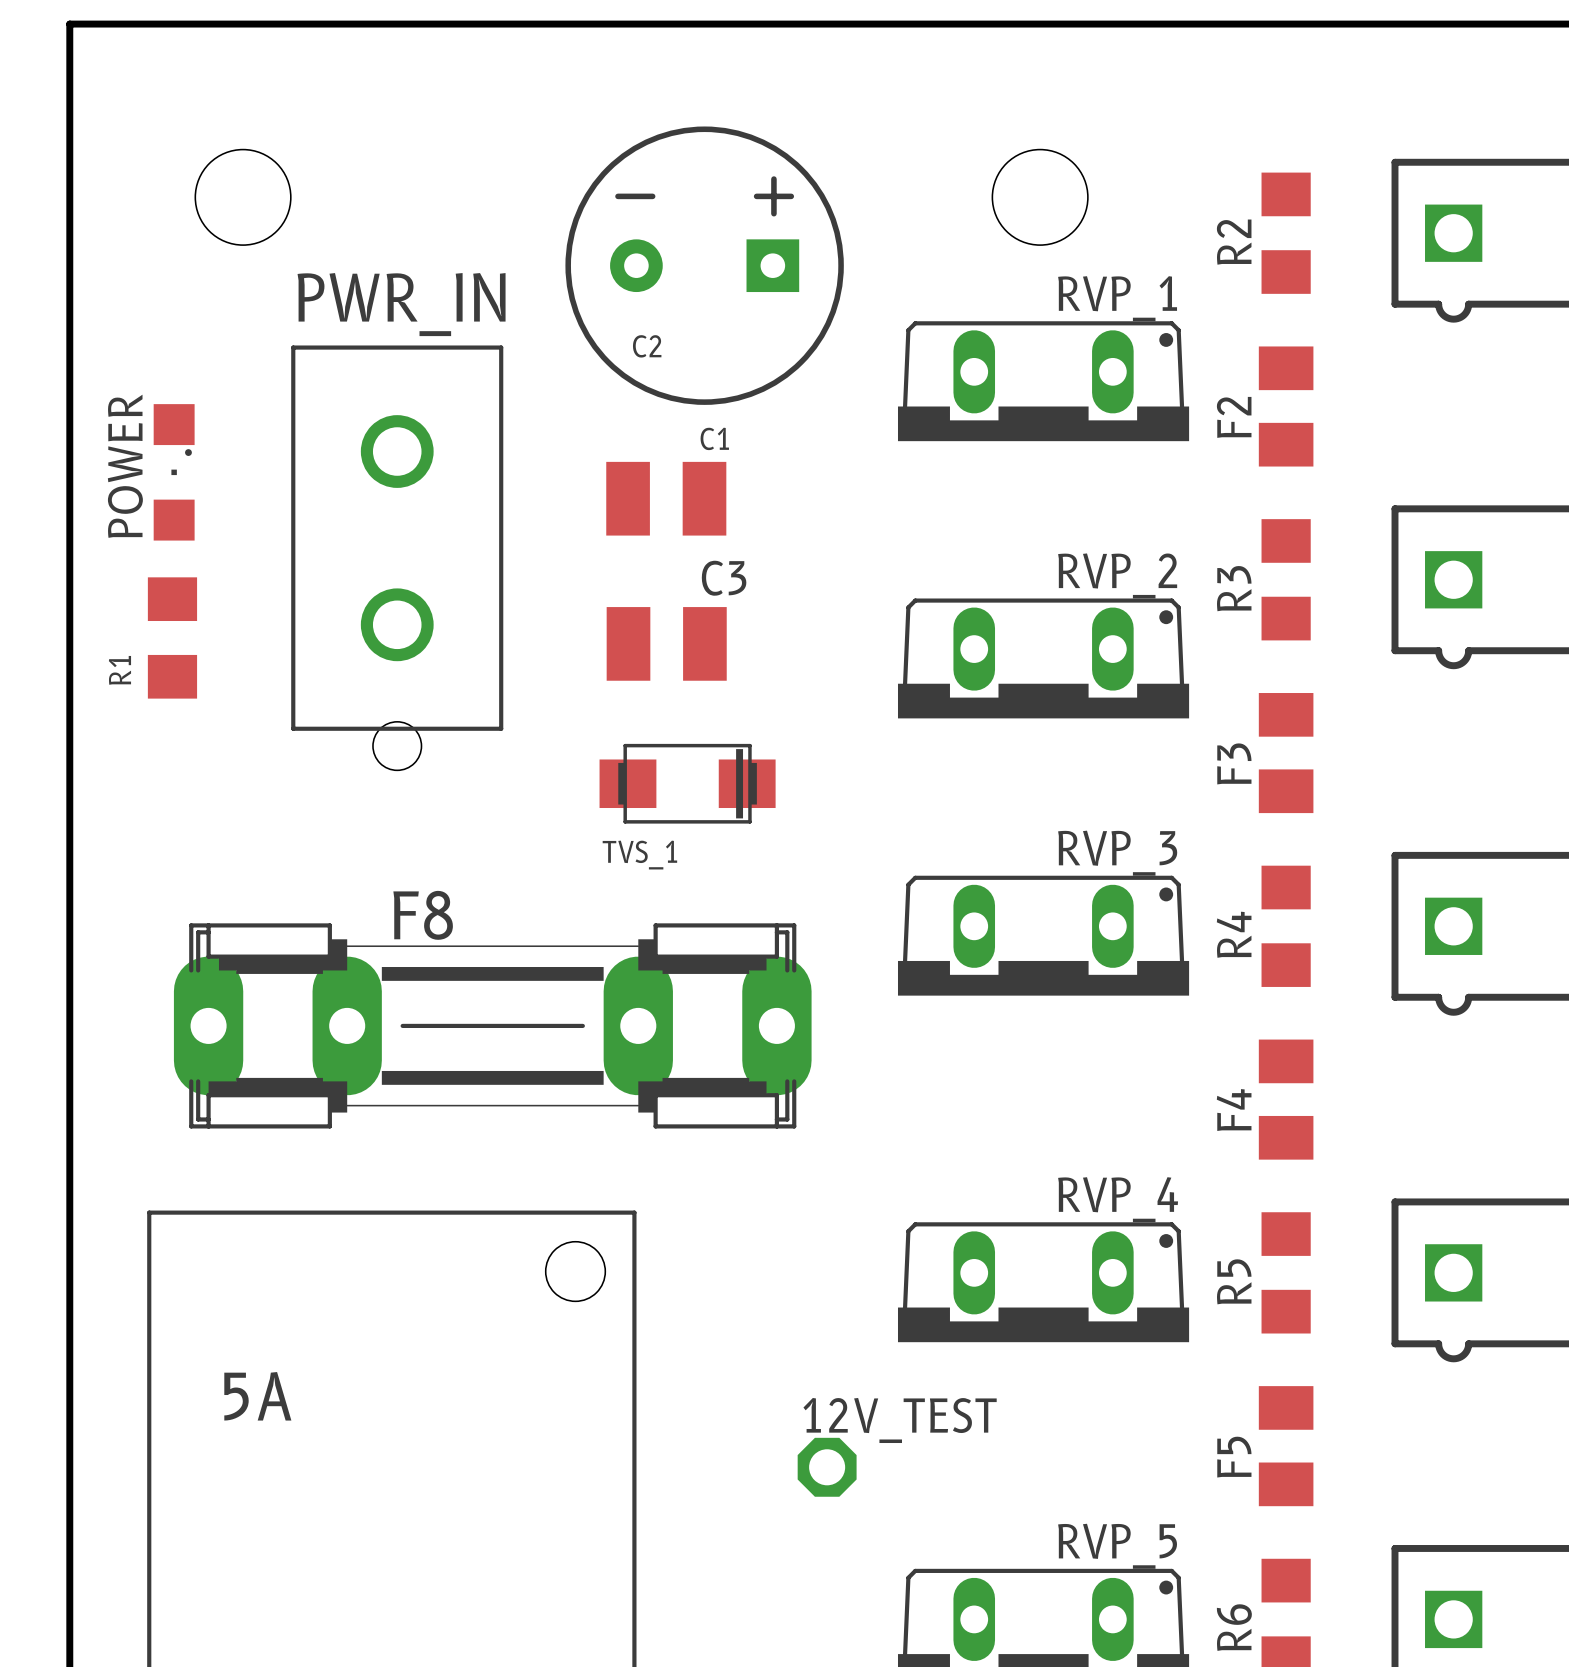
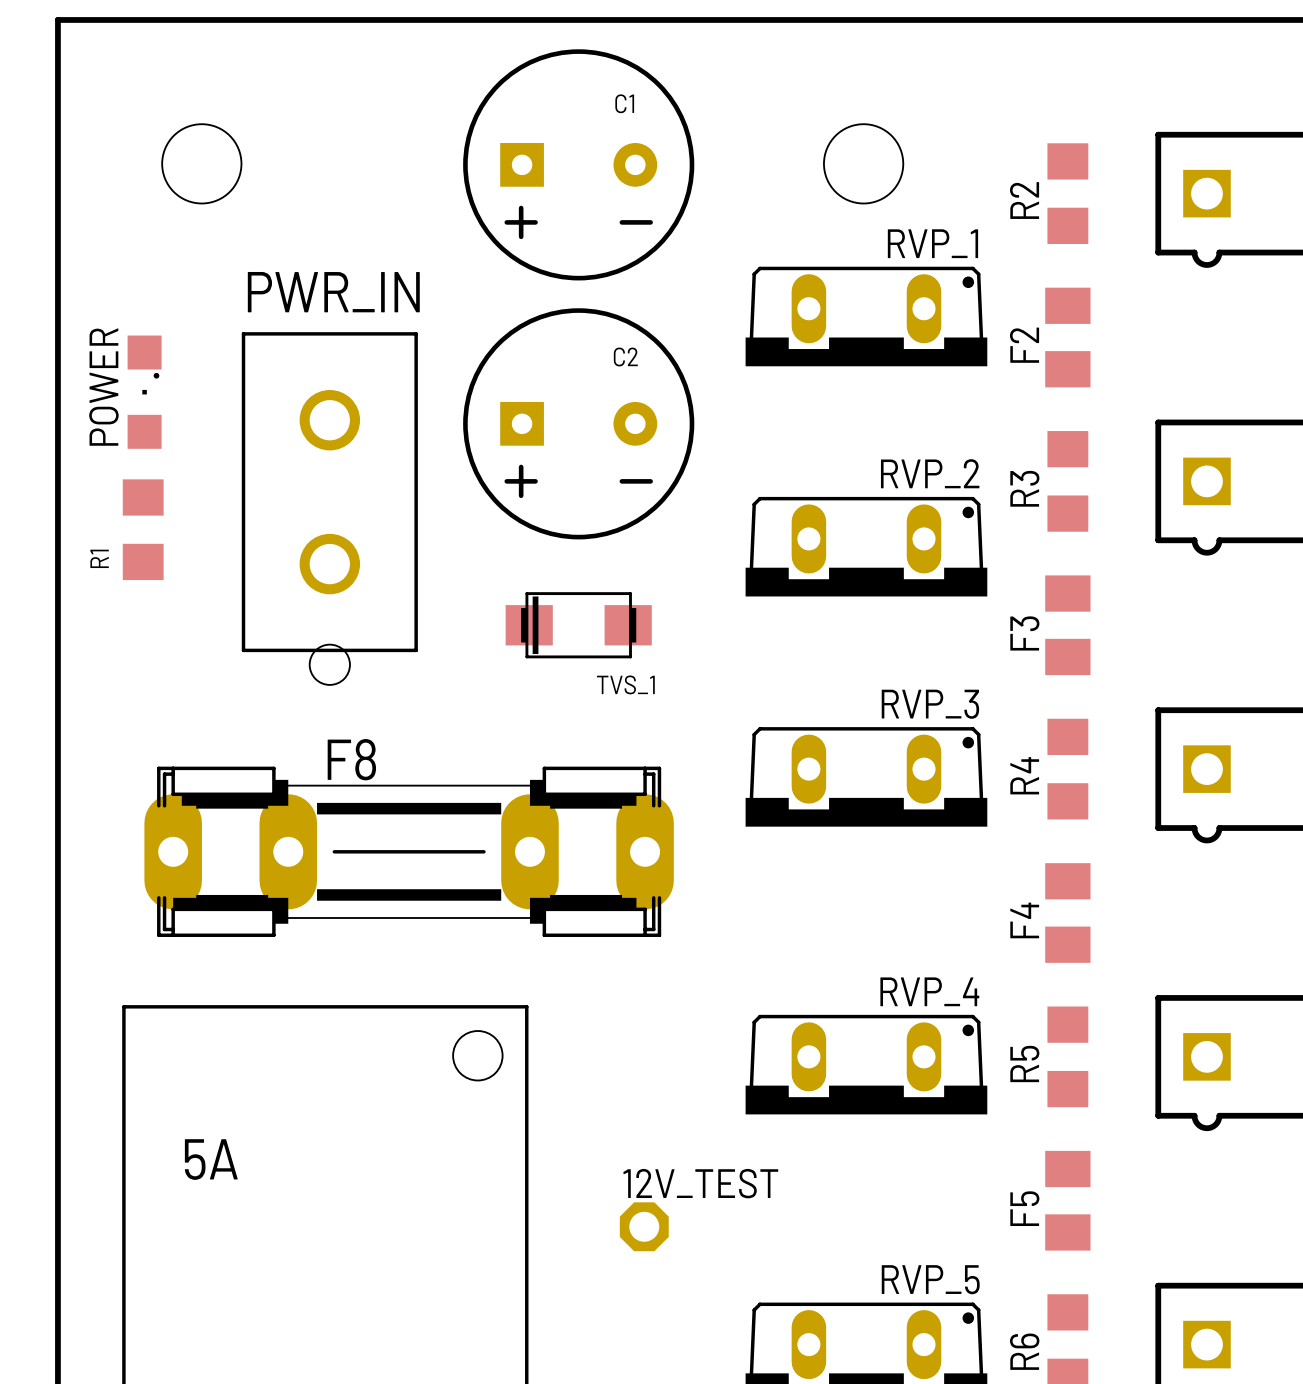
C2 rotation: 0° (704, 265) -> 180° (578, 423)
C2 position: (704, 265) -> (578, 423)
C1 footprint: [606, 461, 727, 536] -> [463, 49, 695, 281]
PWR_IN position: (397, 557) -> (329, 508)
C3: (666, 643) -> none
TVS_1 rotation: 0° (687, 783) -> 180° (578, 625)
TVS_1 name position: TVS_1 (639, 855) -> TVS_1 (625, 684)
12V_TEST position: (827, 1467) -> (644, 1226)

